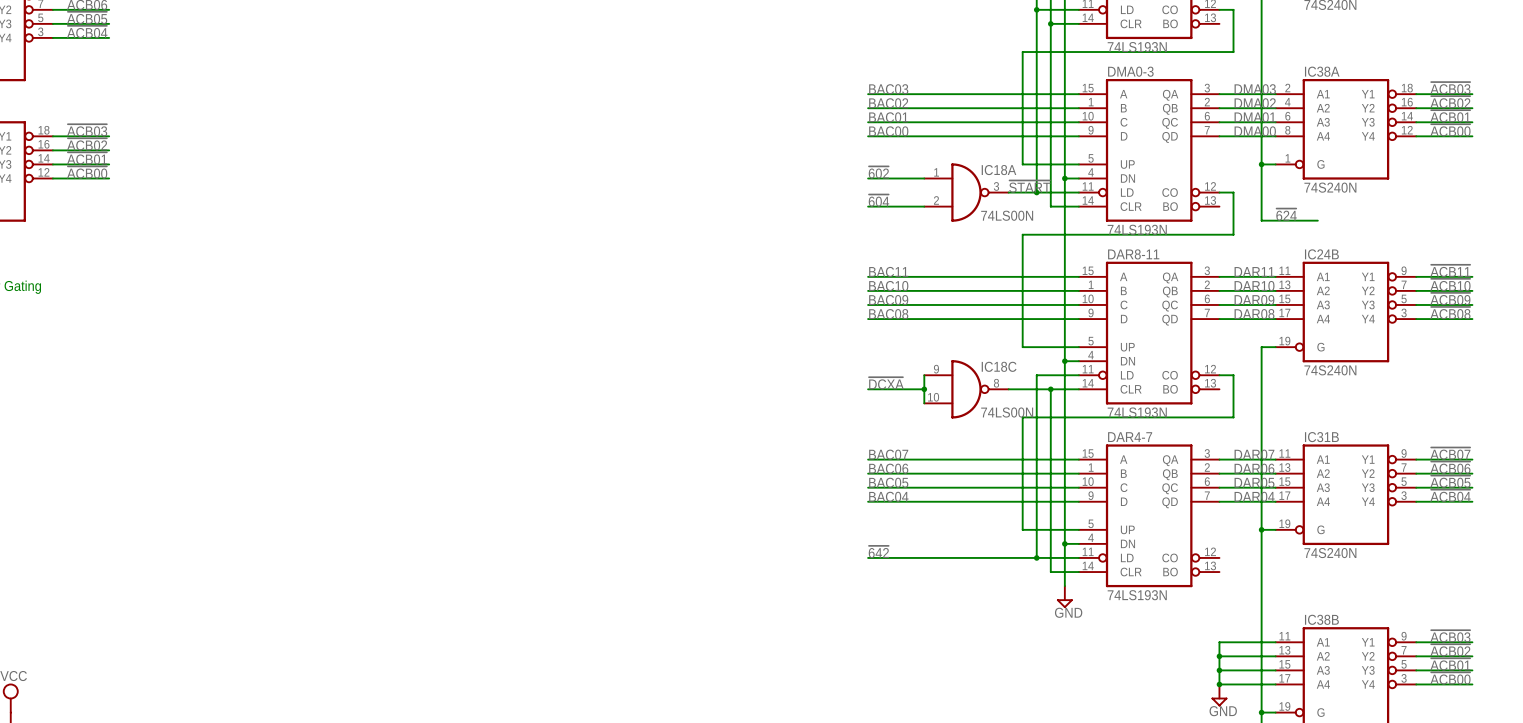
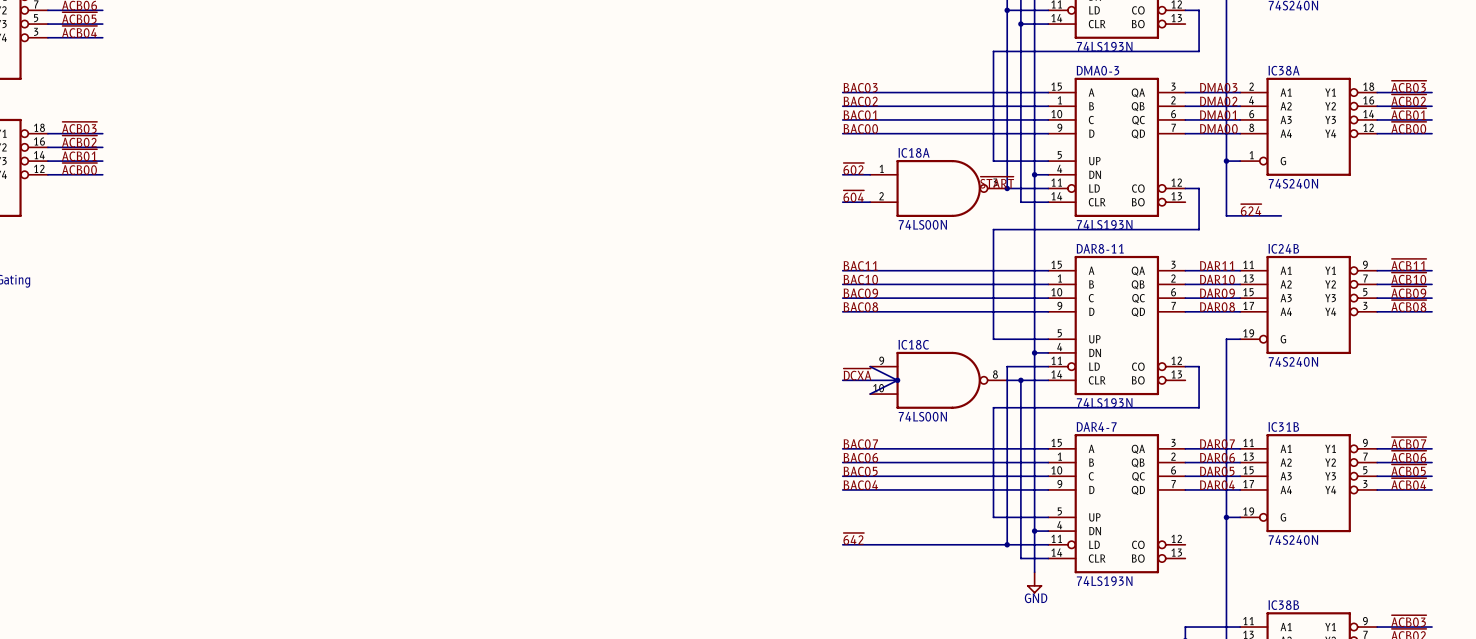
IC18A symbol: [924, 163, 1009, 222] -> [870, 159, 1008, 217]
IC18A name position: IC18A (998, 170) -> IC18A (914, 152)
IC18A value position: 74LS00N (1007, 215) -> 74LS00N (922, 224)
IC18C symbol: [924, 360, 1009, 419] -> [870, 351, 1008, 409]
IC18C name position: IC18C (999, 366) -> IC18C (913, 344)
wire: none -> (870, 366) (897, 380) (870, 394)
IC18C value position: 74LS00N (1007, 412) -> 74LS00N (922, 416)

